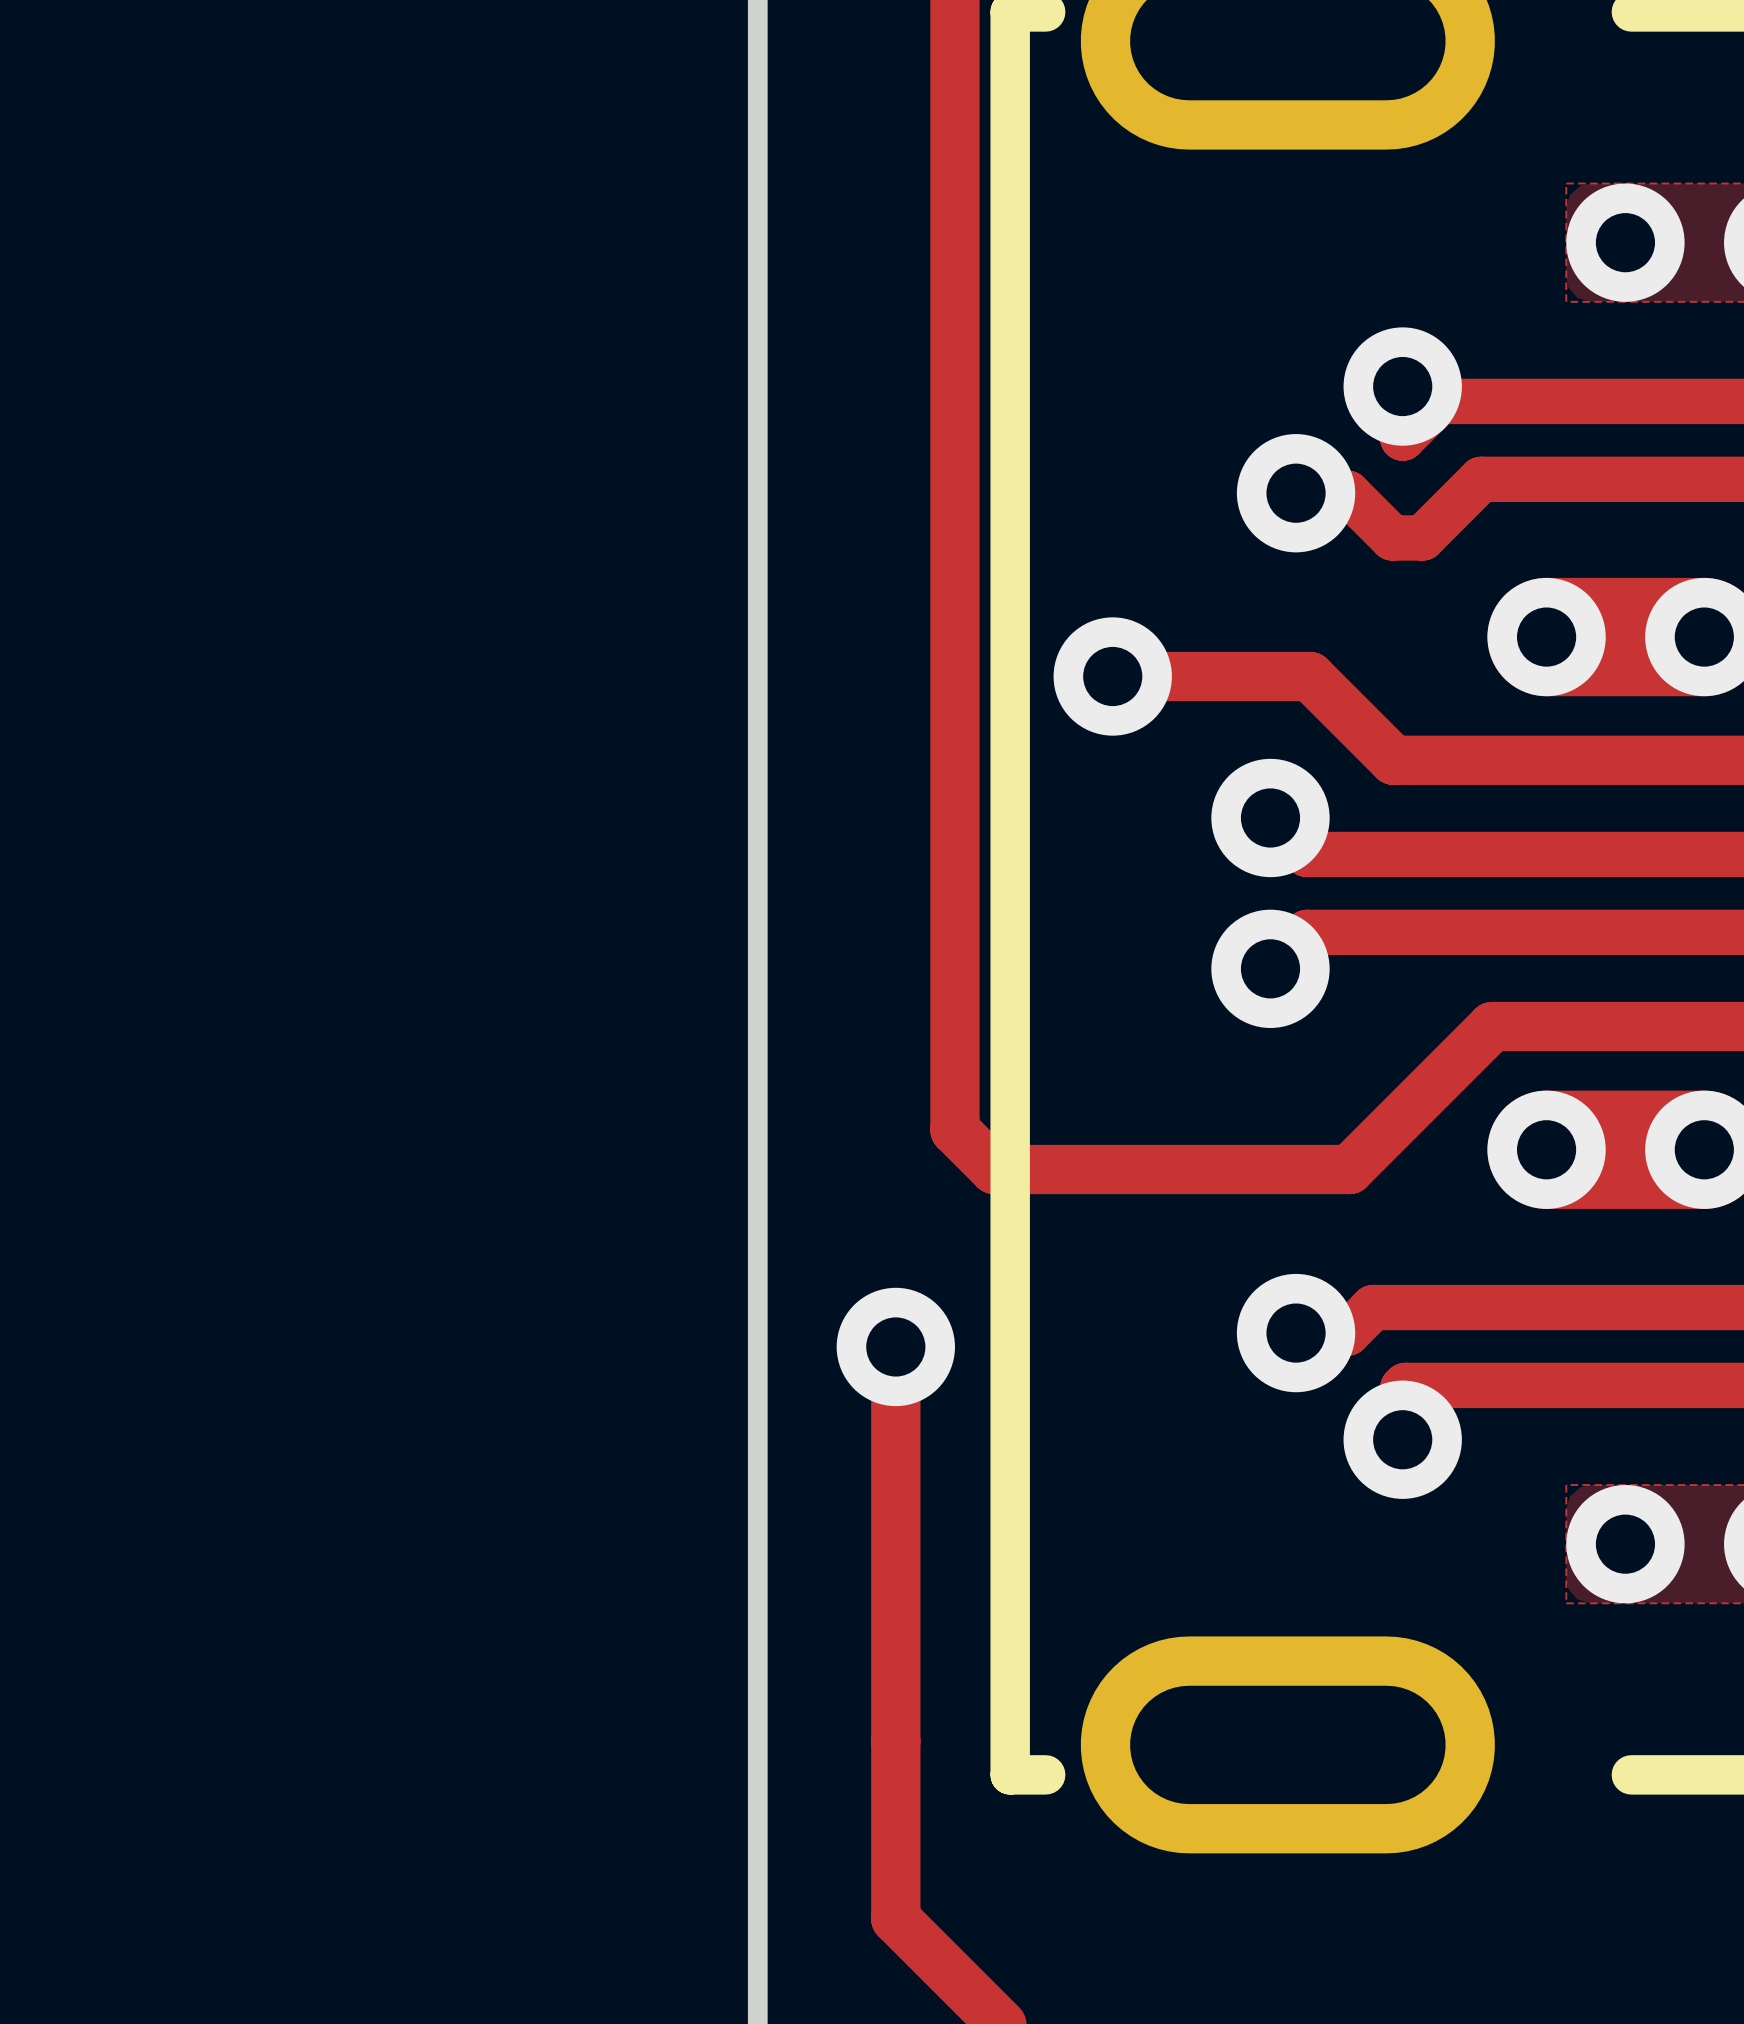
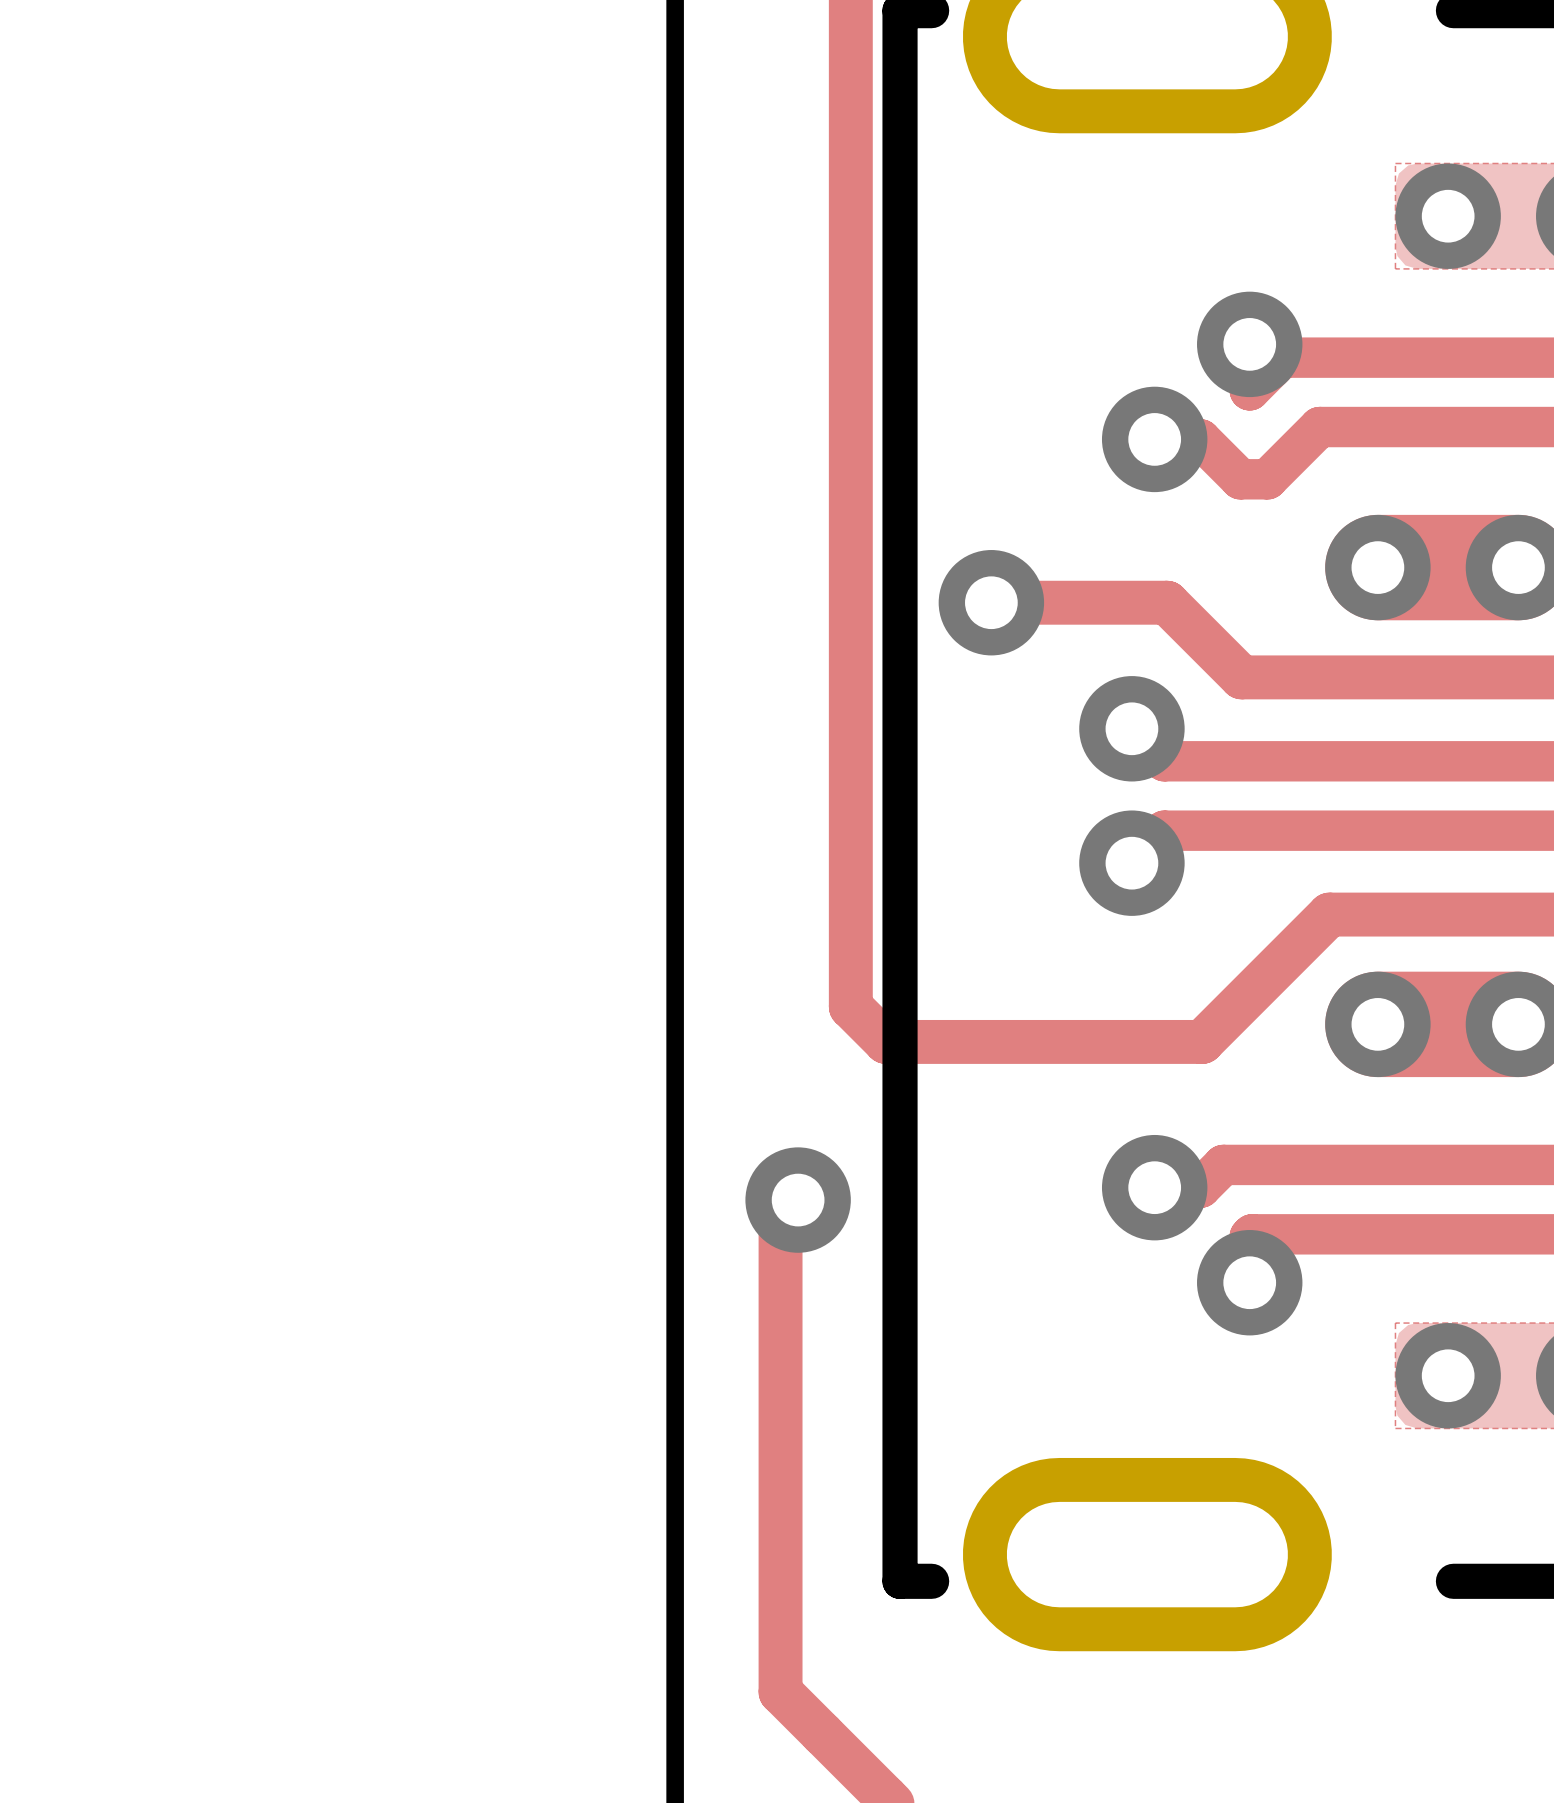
track: (895, 1346) (895, 1918) -> (798, 1200) (780, 1217) (780, 1691) (798, 1709)

